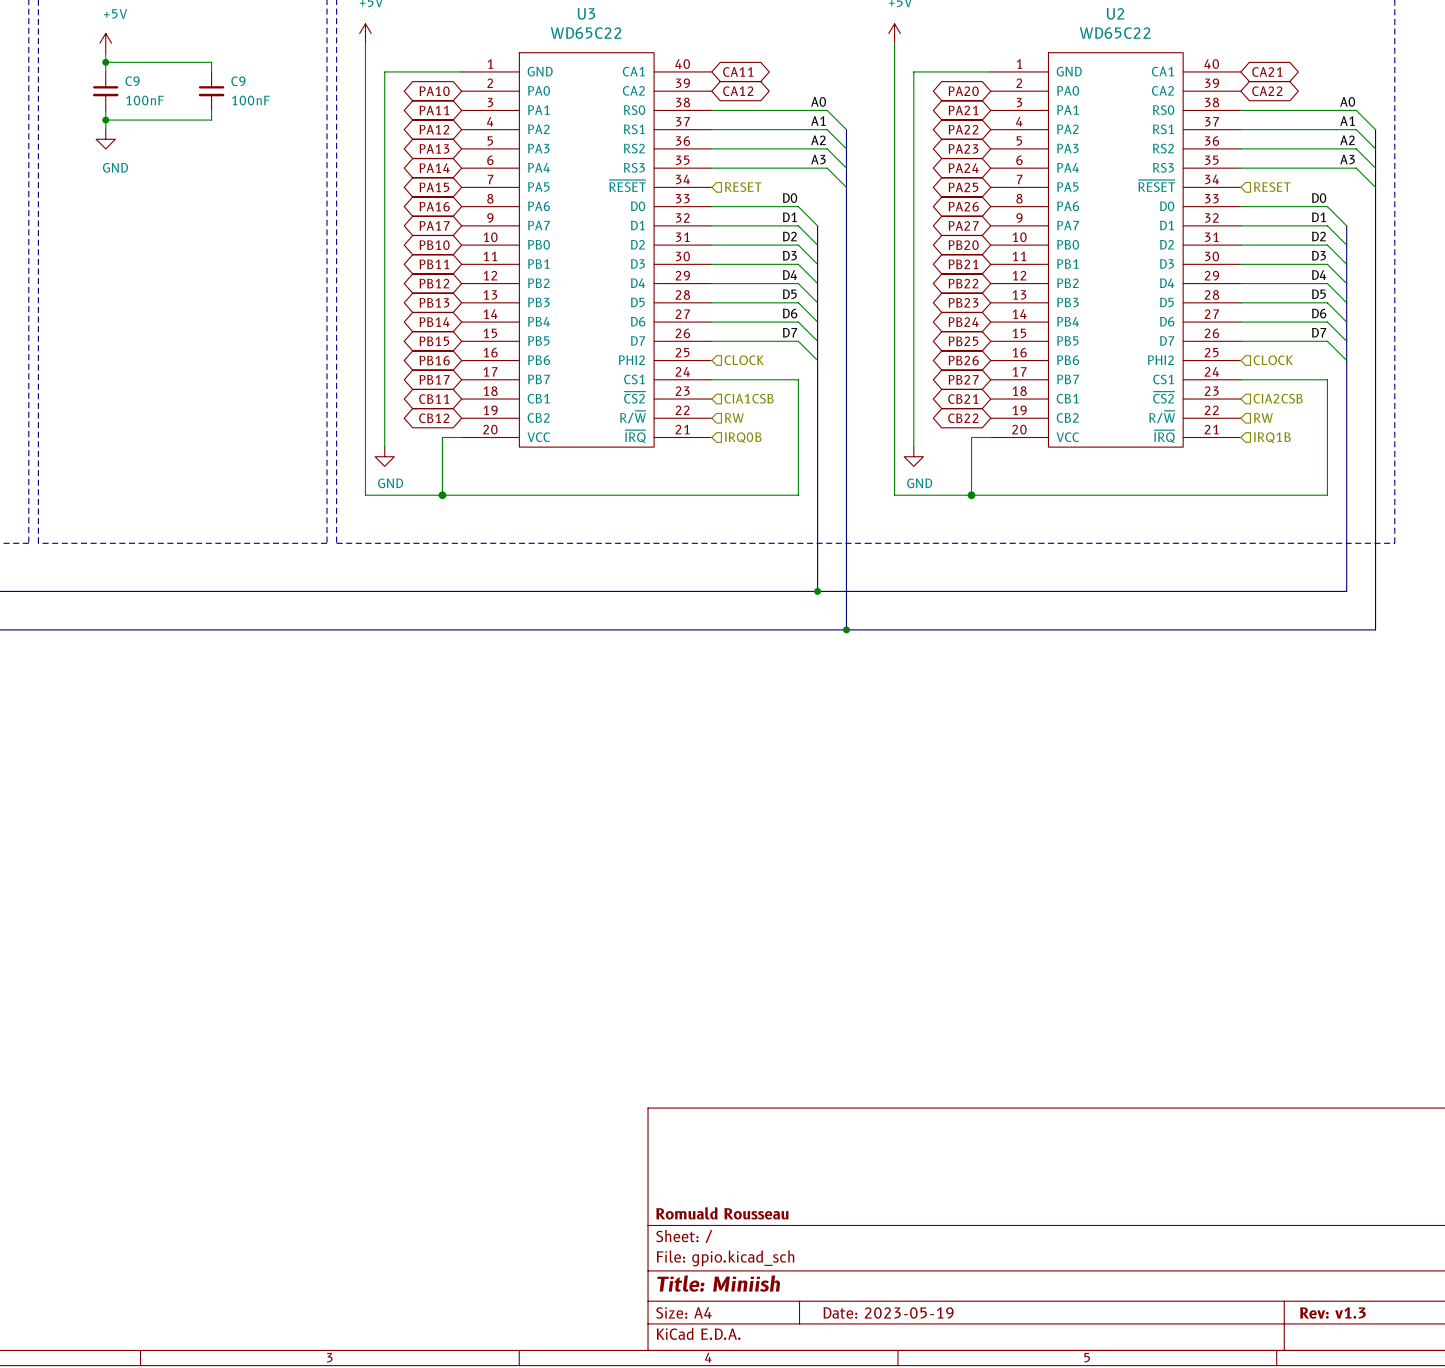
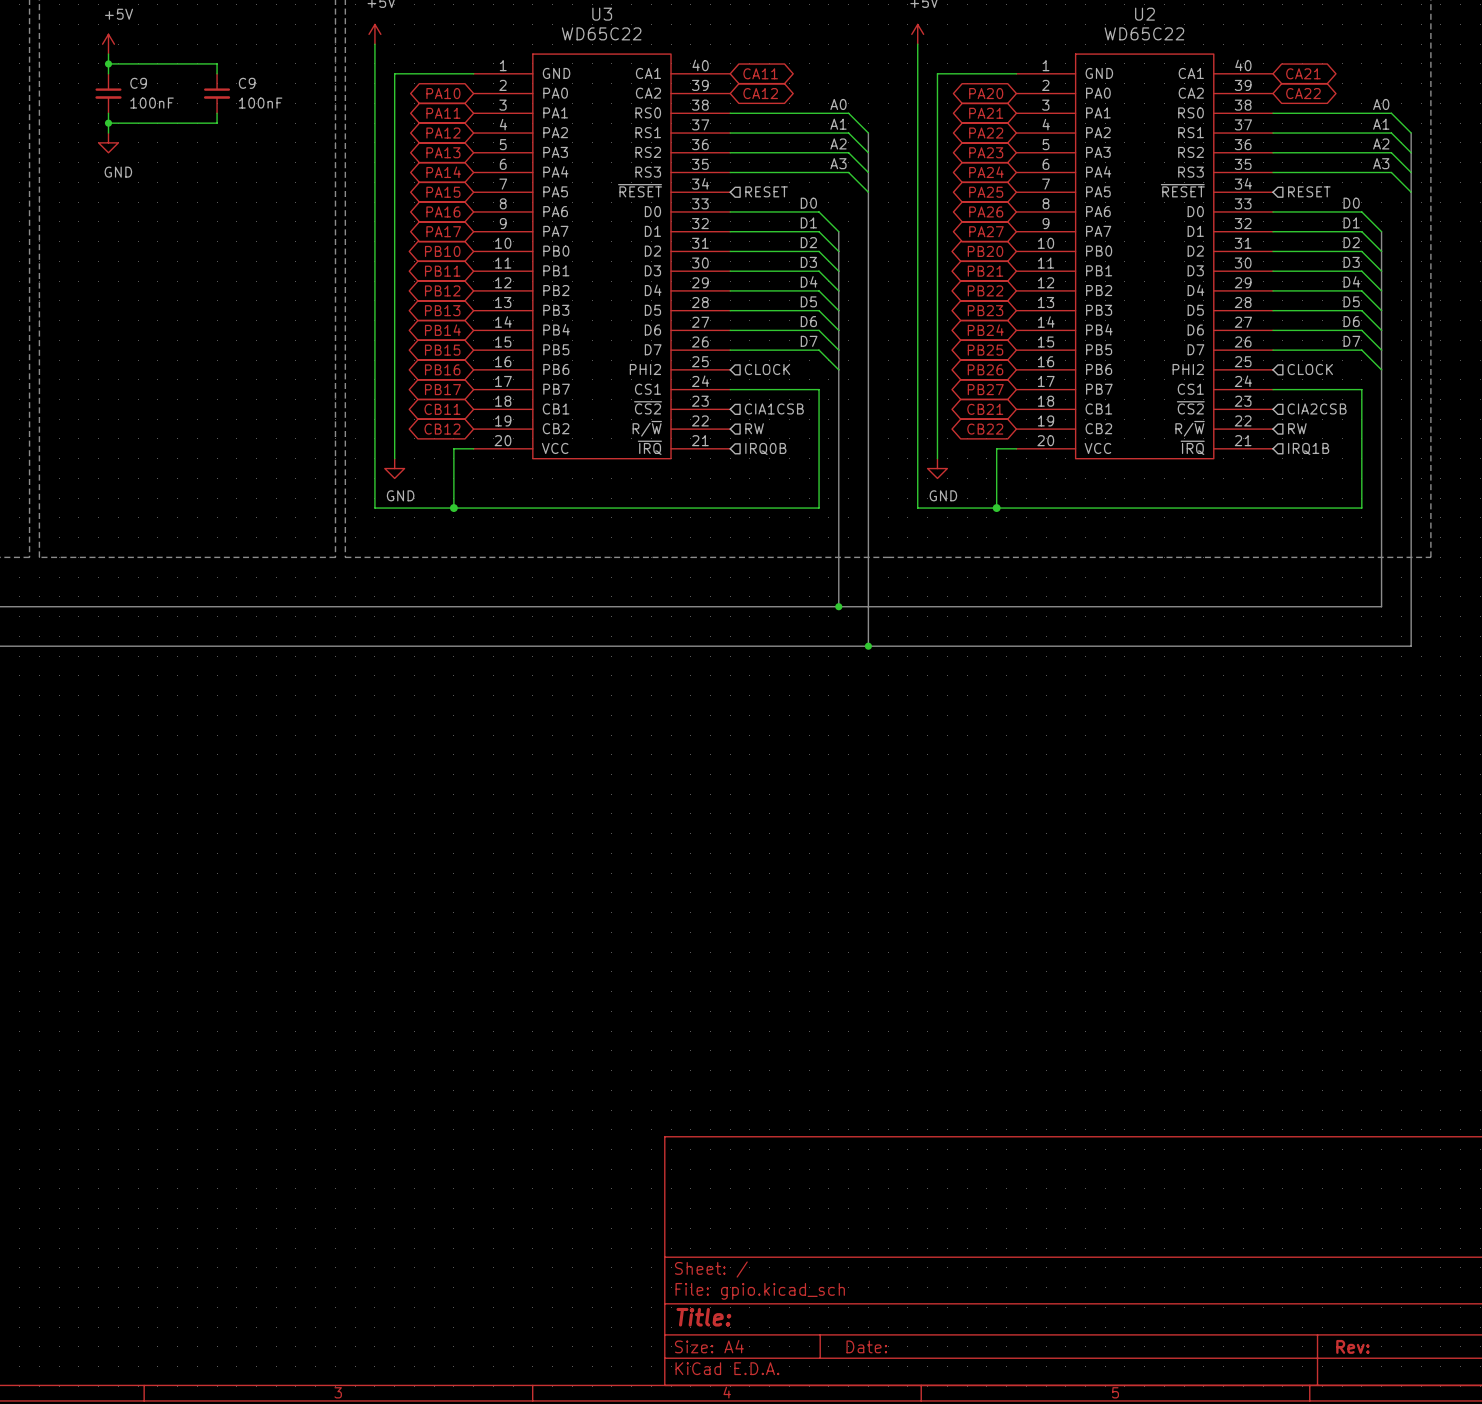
title block: Romuald Rousseau (722, 1213) -> none
title block: Title: Miniish (718, 1283) -> Title: (703, 1317)
title block: Date: 2023-05-19 (888, 1312) -> Date: (866, 1346)
title block: Rev: v1.3 (1332, 1313) -> Rev: (1352, 1346)

